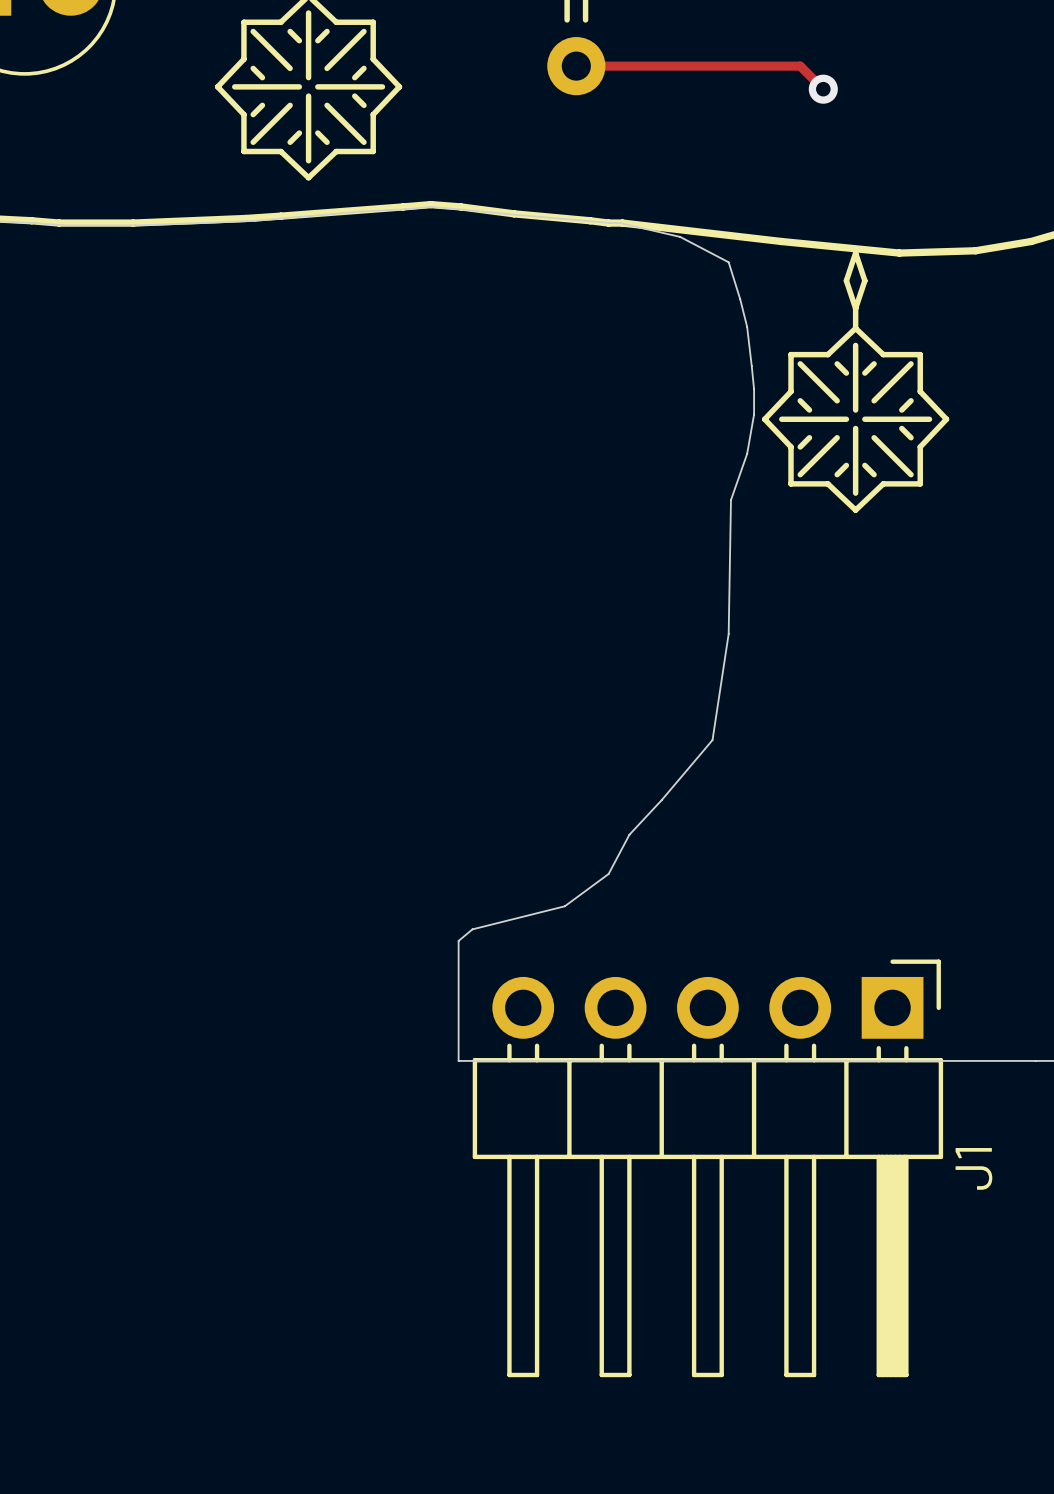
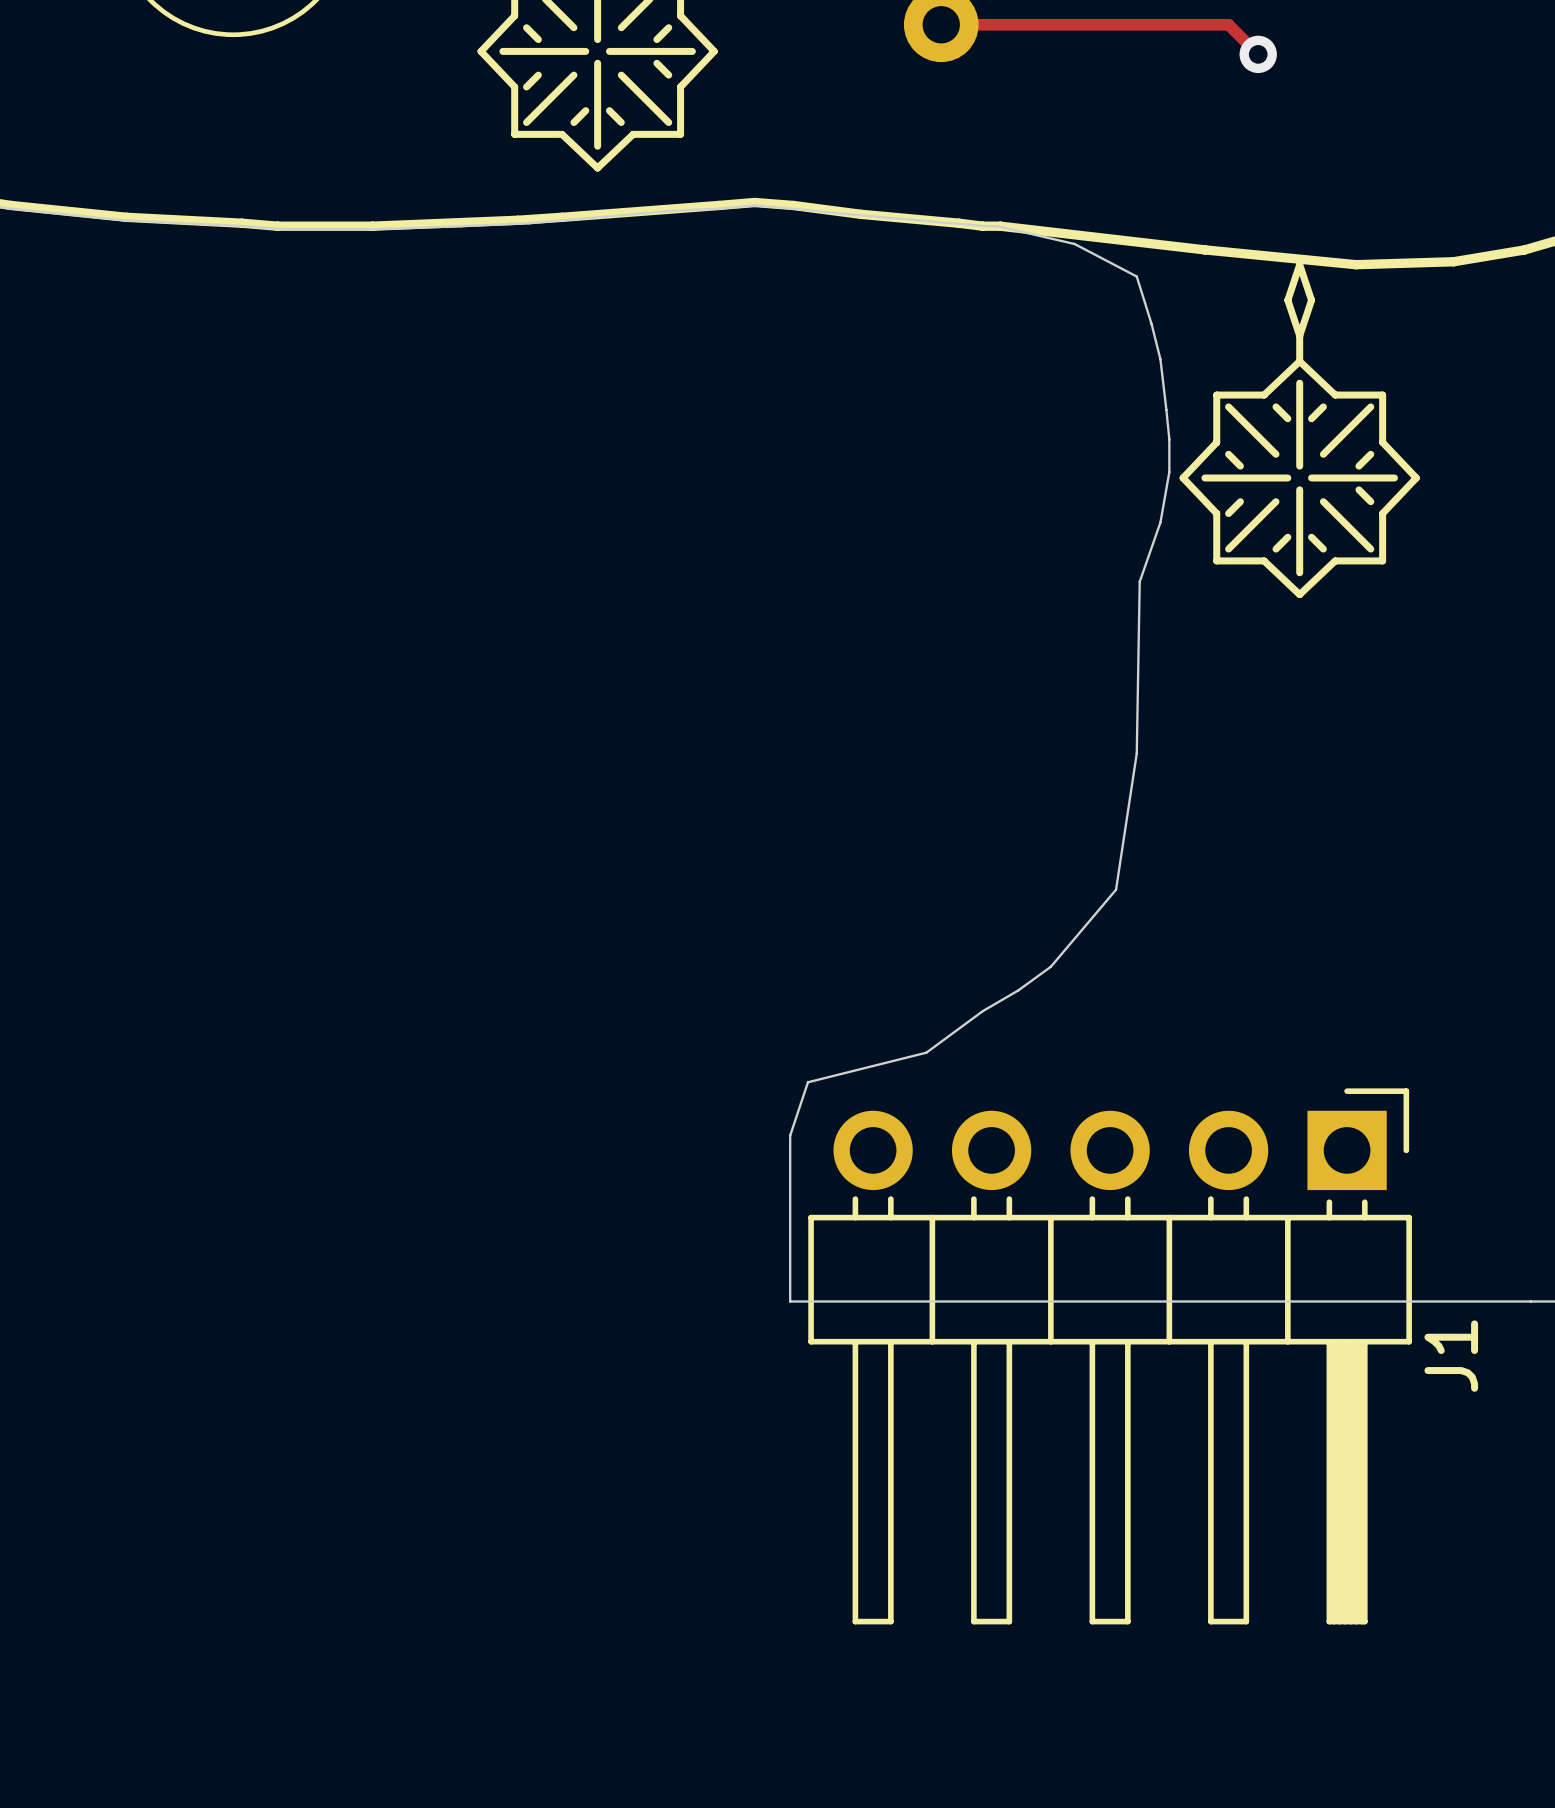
board edge: (661, 800) (629, 834) (608, 873) (564, 906) (472, 929) (458, 940) -> (1050, 966) (1018, 990) (982, 1011) (926, 1052) (807, 1082) (790, 1135) (790, 1147)
J1 position: (707, 1168) -> (1110, 1356)

